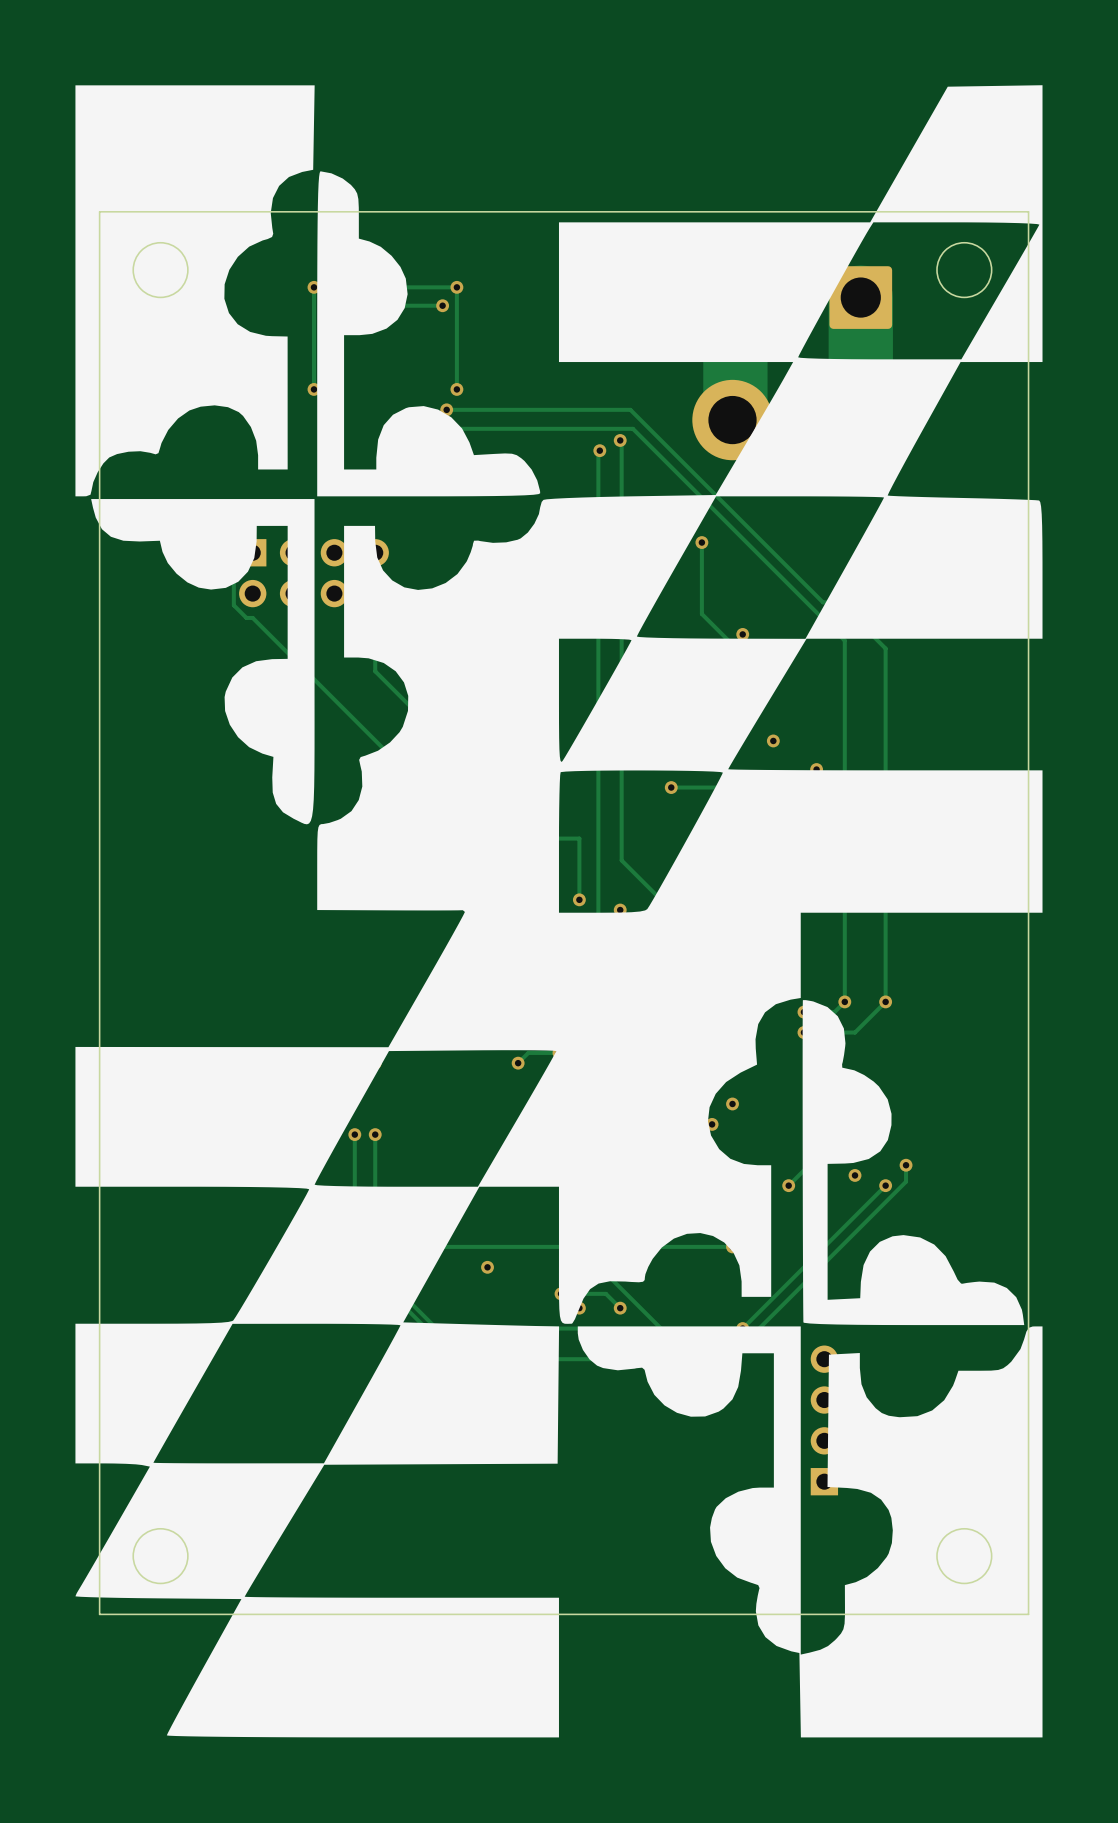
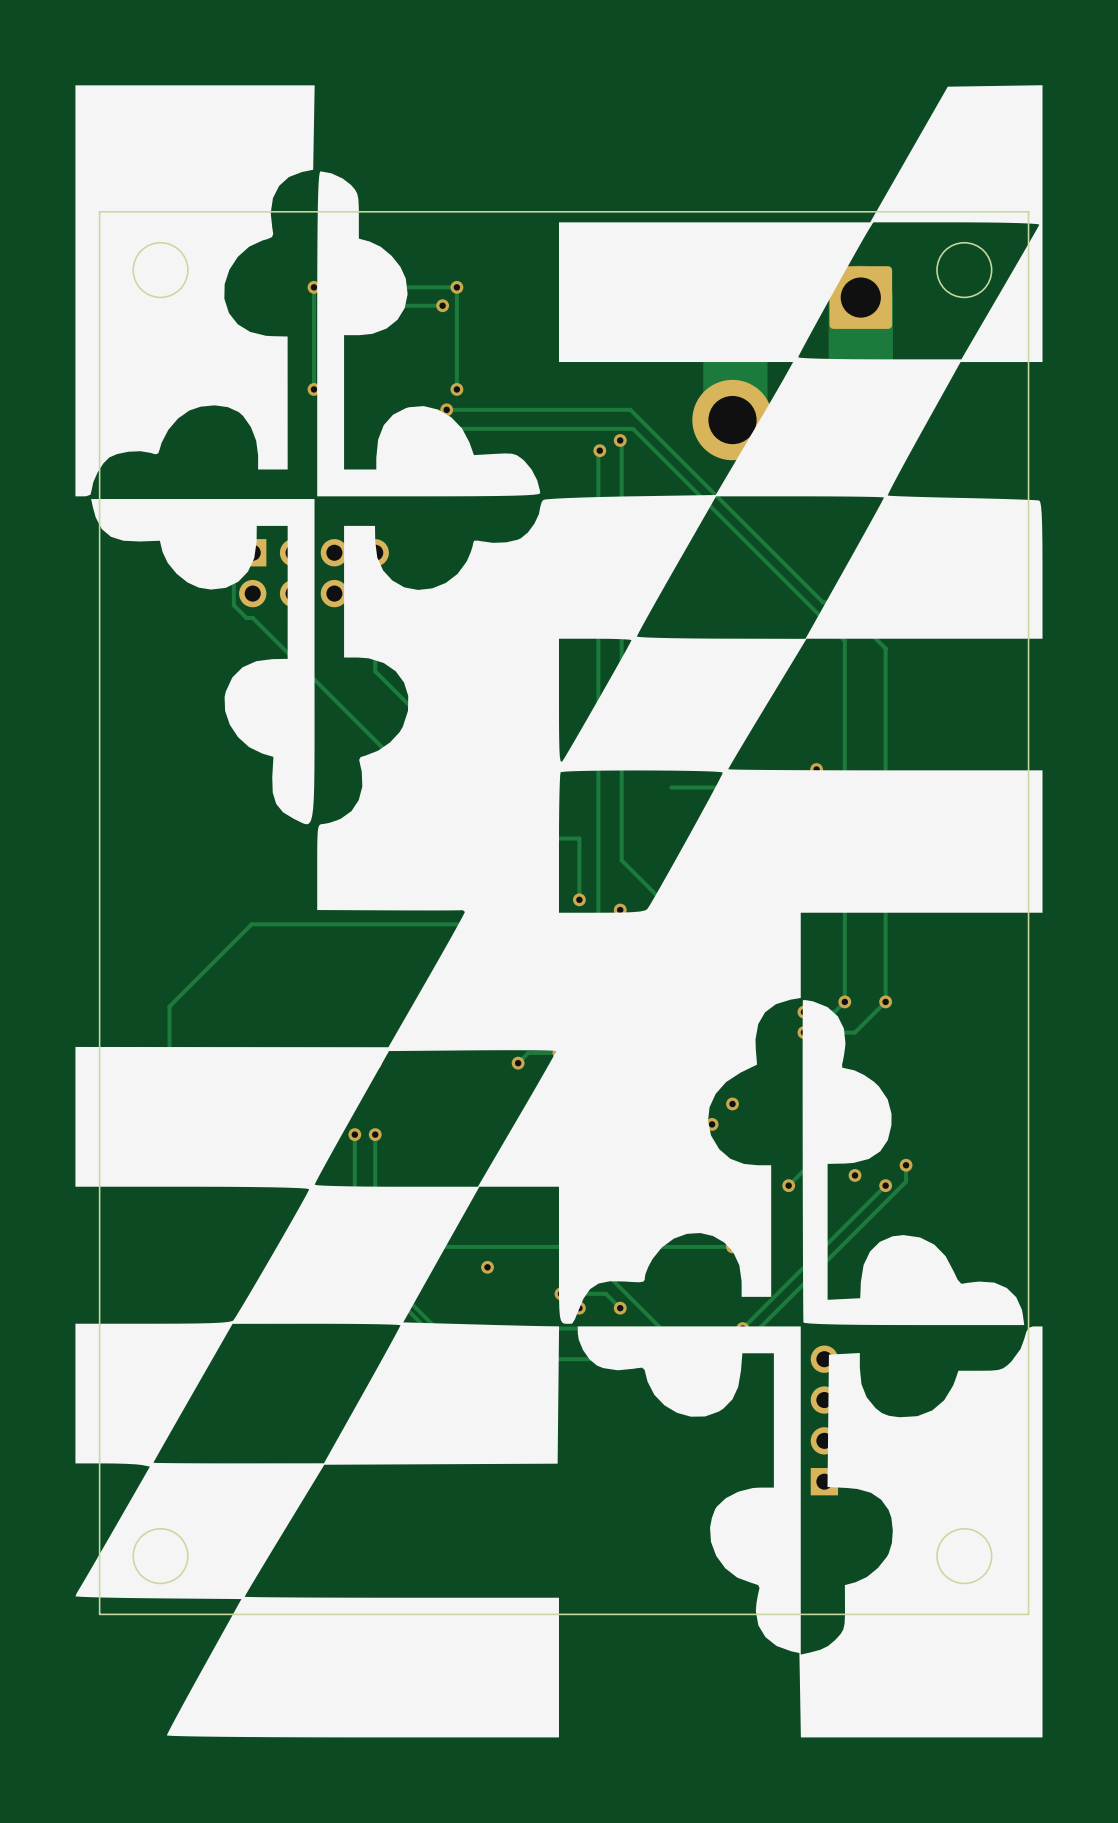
track: (701, 542) (701, 614) (752, 665) -> none
via: (701, 542) -> none
via: (742, 634) -> none
via: (773, 740) -> none
via: (671, 787) -> none
track: none -> (497, 924) (251, 924) (169, 1006) (169, 1085) (150, 1103)

